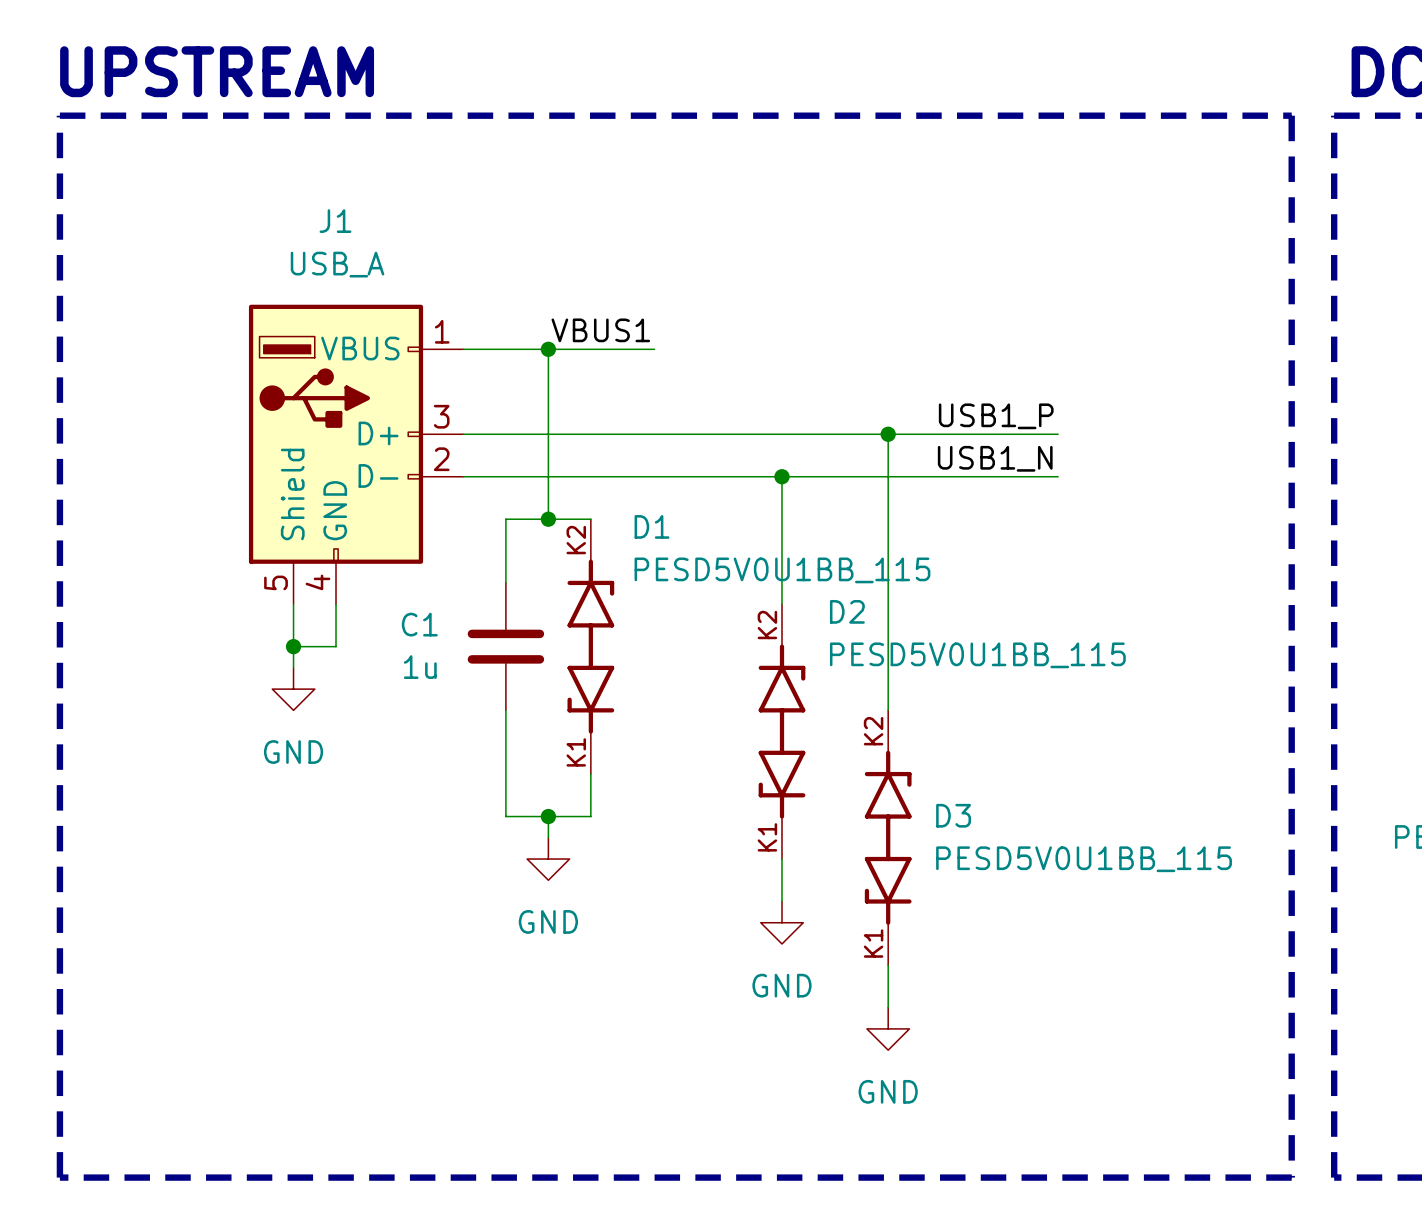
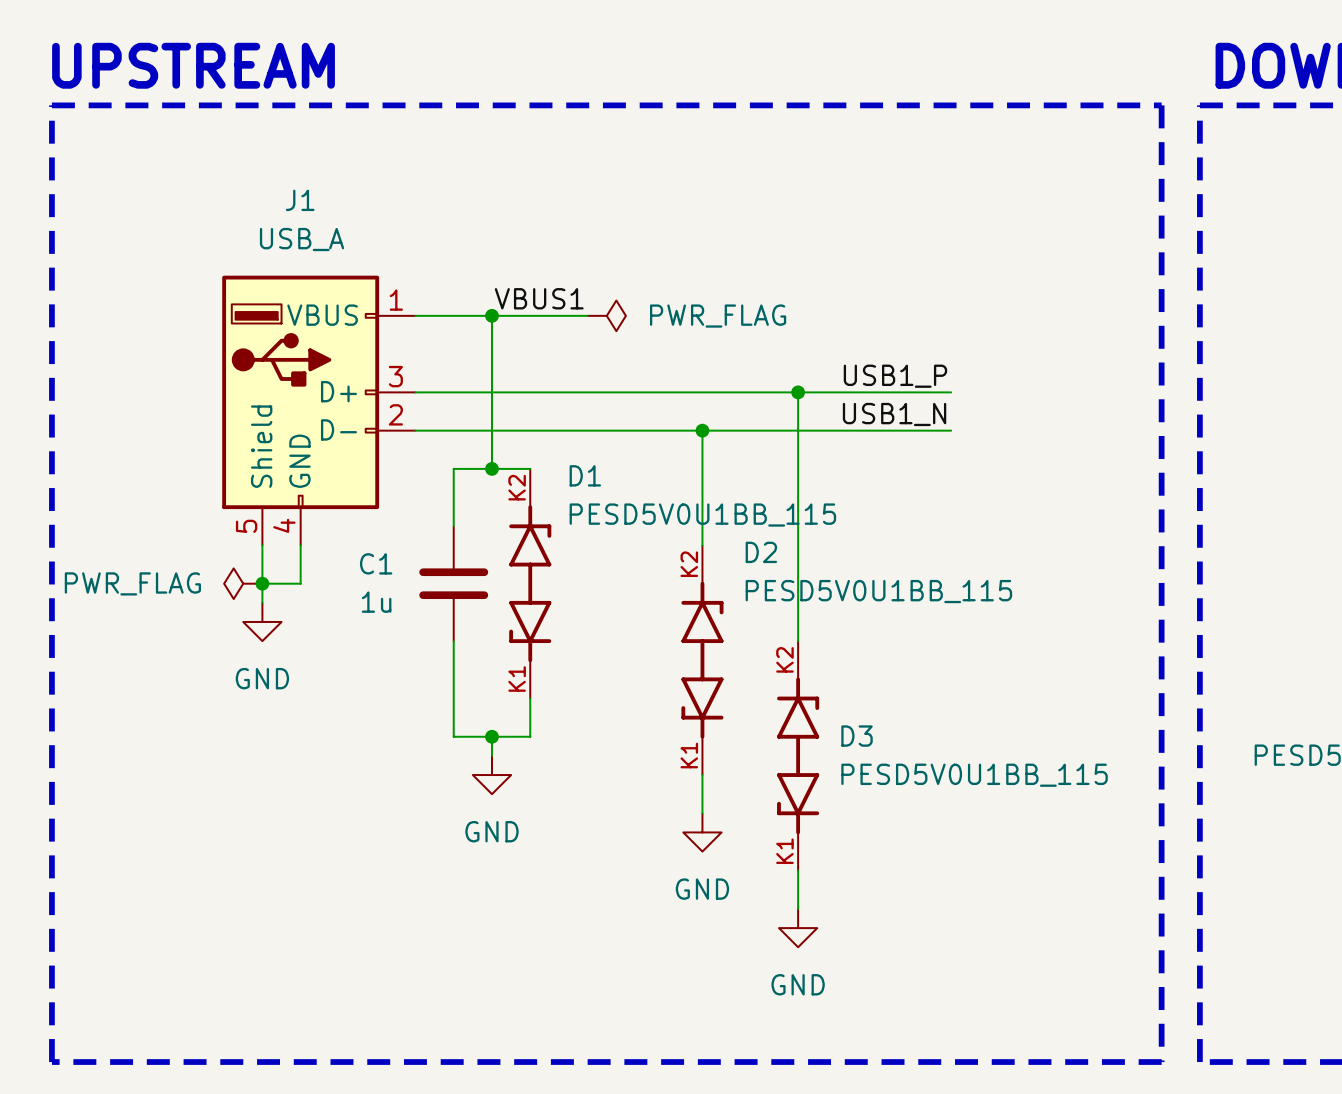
power symbol: none -> PWR_FLAG (606, 315)
power symbol: none -> PWR_FLAG (243, 583)

